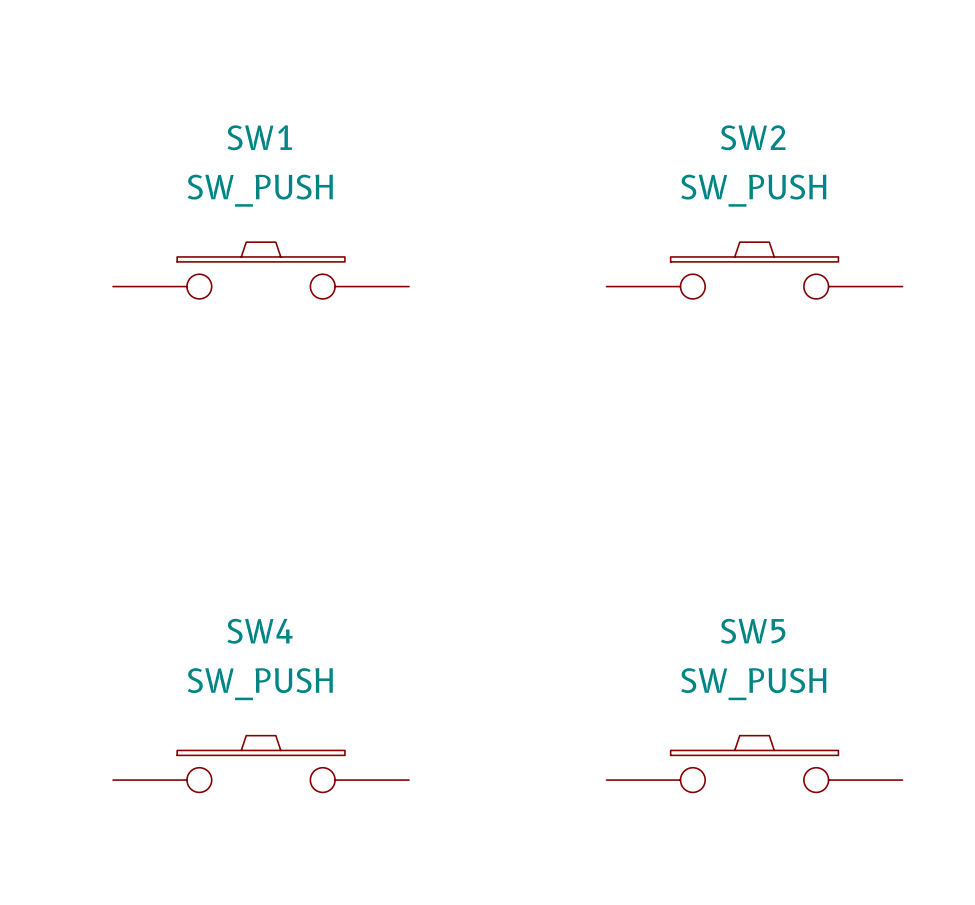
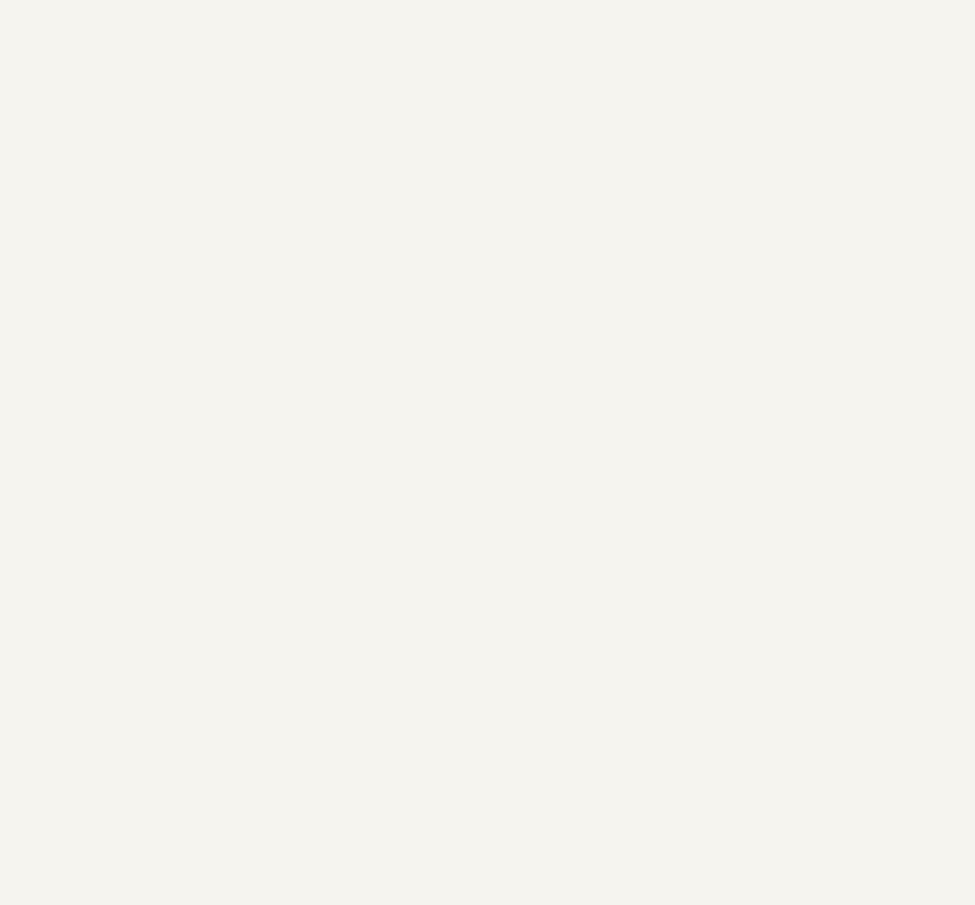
SW1: SW_PUSH (261, 270) -> none
SW2: SW_PUSH (754, 270) -> none
SW4: SW_PUSH (261, 764) -> none
SW5: SW_PUSH (754, 764) -> none

